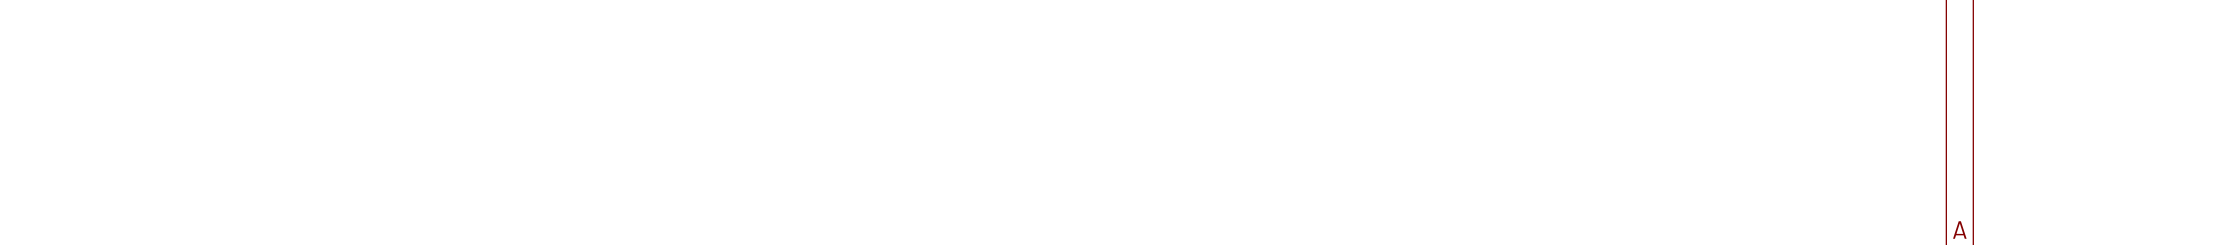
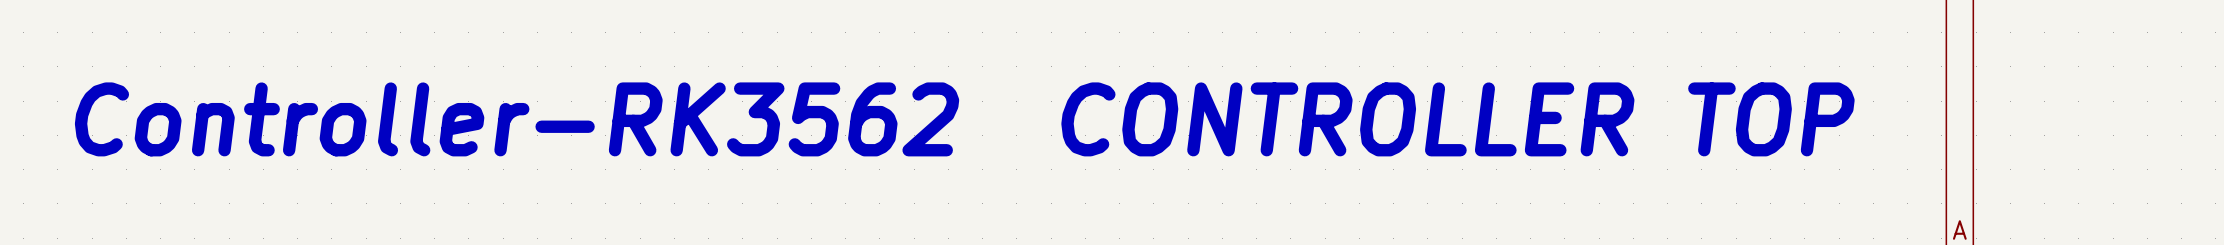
text: none -> Controller-RK3562 CONTROLLER TOP (964, 119)

